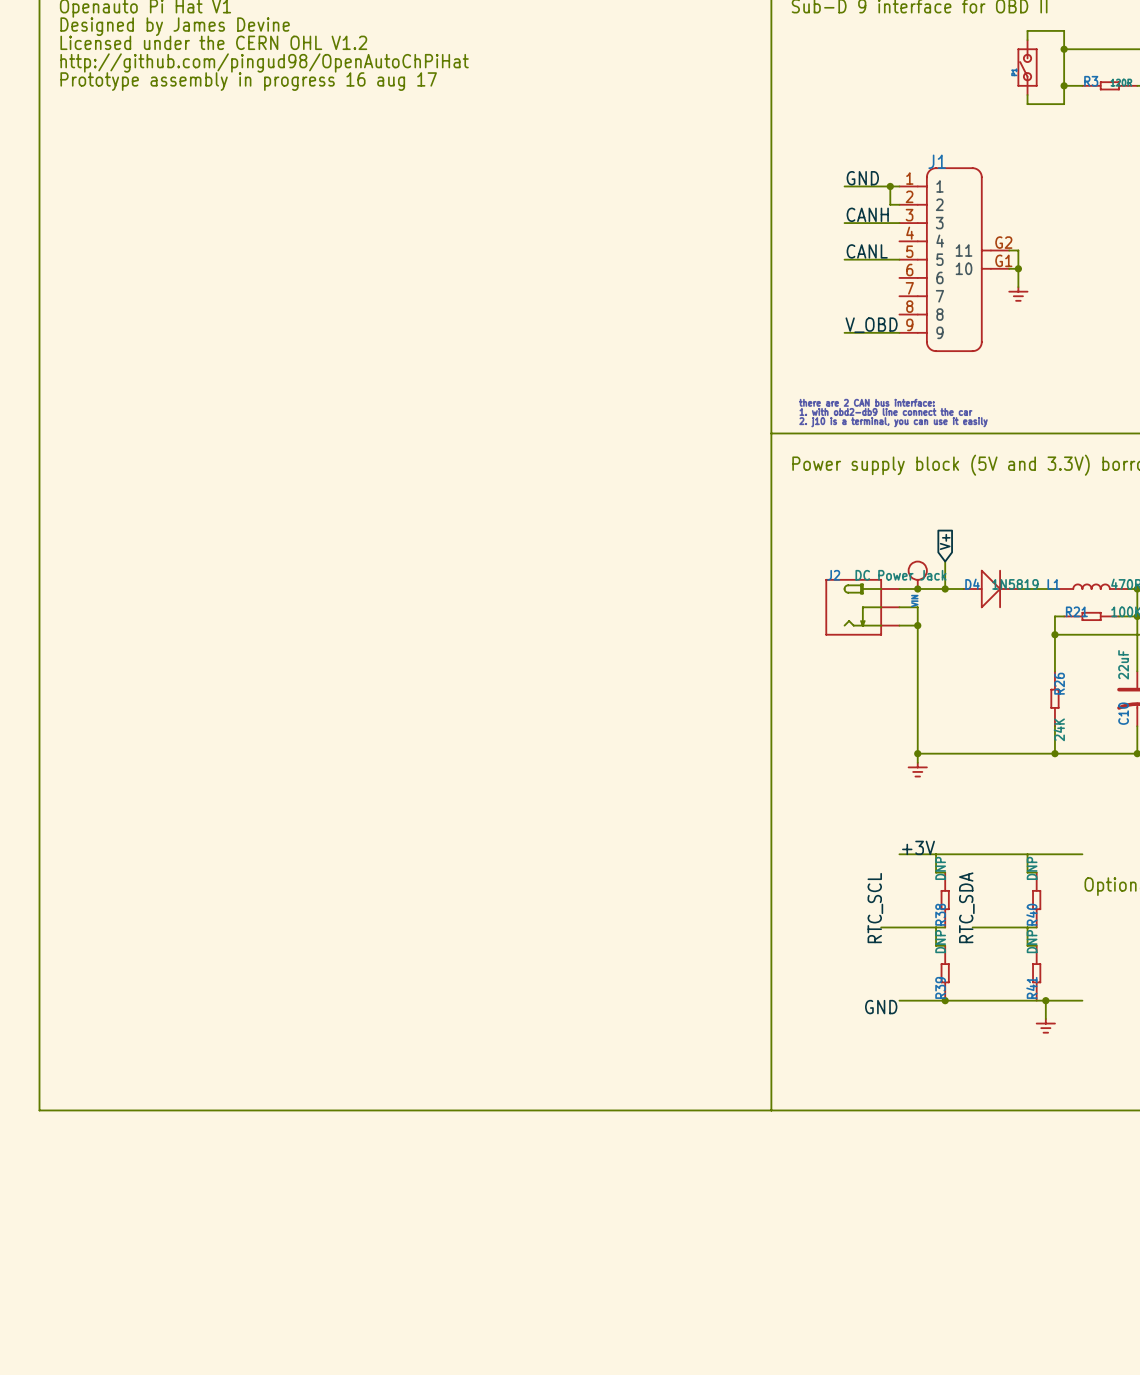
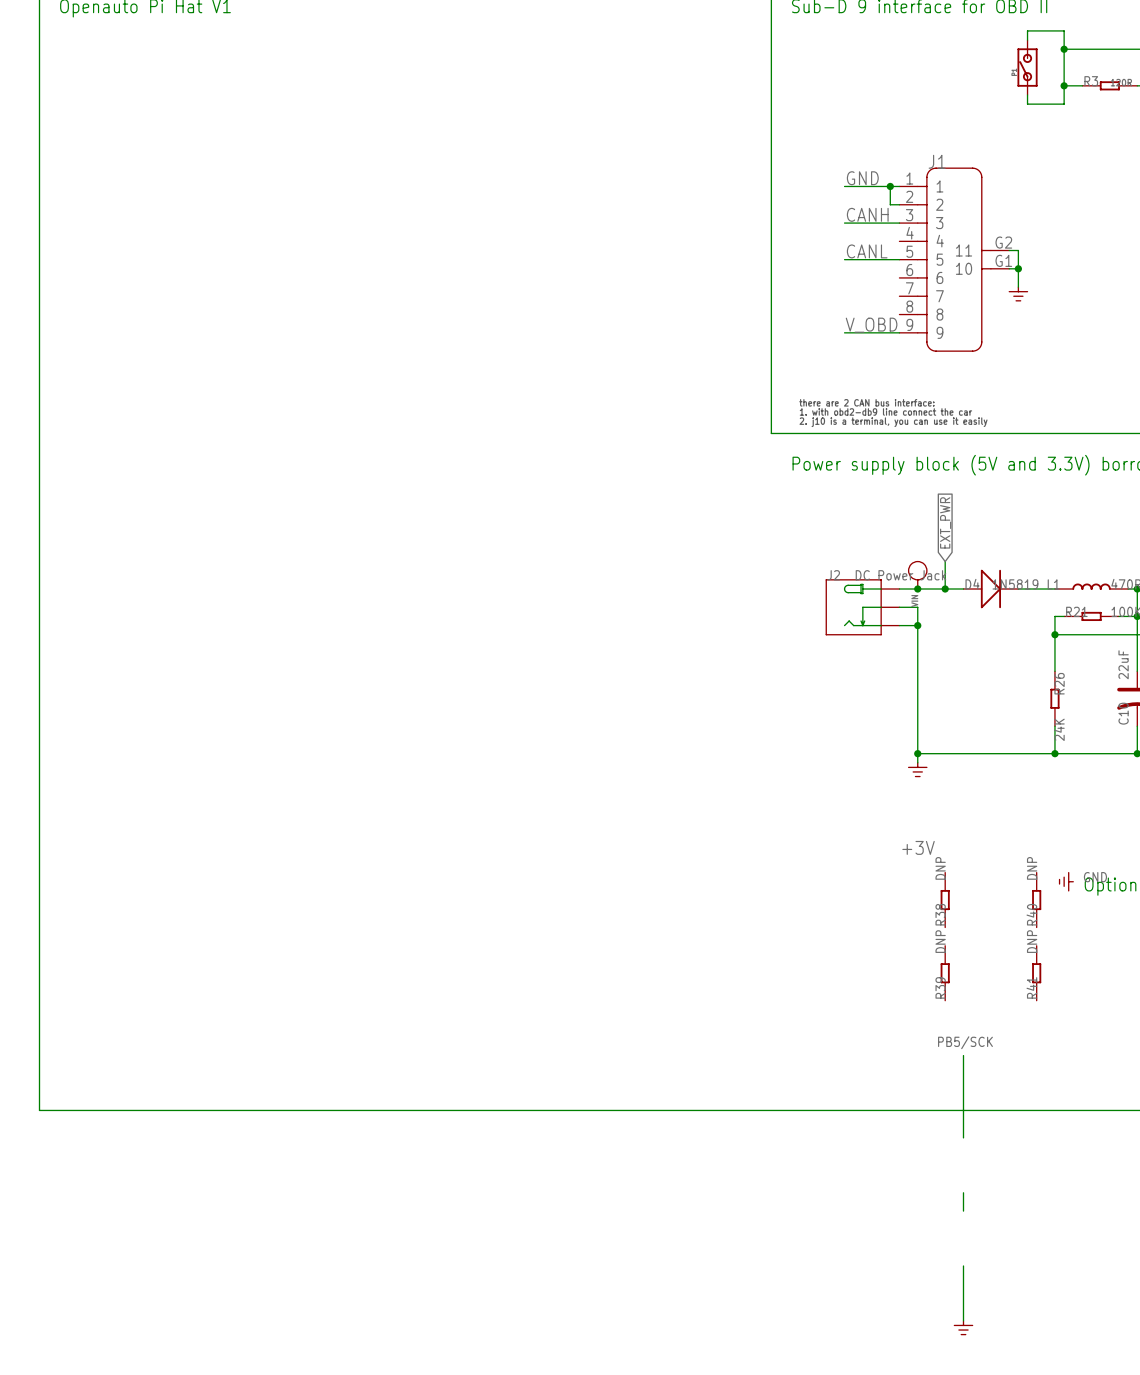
text: Designed by James Devine (175, 26) -> none
text: Licensed under the CERN OHL V1.2 (213, 42) -> none
text: http://github.com/pingud98/OpenAutoChPiHat (264, 62) -> none
text: Prototype assembly in progress 16 aug 17 (248, 81) -> none
wire: (771, 433) (771, 1110) -> none
global label: V+ (945, 541) -> EXT_PWR (945, 522)
wire: (899, 854) (1082, 854) -> none
wire: (936, 854) (936, 872) (945, 872) -> none
wire: (1027, 854) (1027, 872) (1036, 872) -> none
label: none -> GND (1095, 877)
power symbol: none -> (1066, 881)
label: RTC_SDA (966, 907) -> none
label: RTC_SCL (875, 908) -> none
wire: (881, 927) (945, 927) -> none
wire: (936, 927) (936, 945) (945, 945) -> none
wire: (972, 927) (1036, 927) -> none
wire: (1027, 927) (1027, 945) (1036, 945) -> none
wire: (899, 1000) (1082, 1000) -> none
junction: (945, 1000) -> none
wire: (1045, 1000) (1045, 1018) -> none
junction: (1045, 1000) -> none
label: GND (881, 1007) -> none
power symbol: (1045, 1025) -> none
label: none -> PB5/SCK (965, 1042)
wire: none -> (963, 1055) (963, 1137)
wire: none -> (963, 1192) (963, 1211)
wire: none -> (963, 1265) (963, 1320)
power symbol: none -> (963, 1327)

